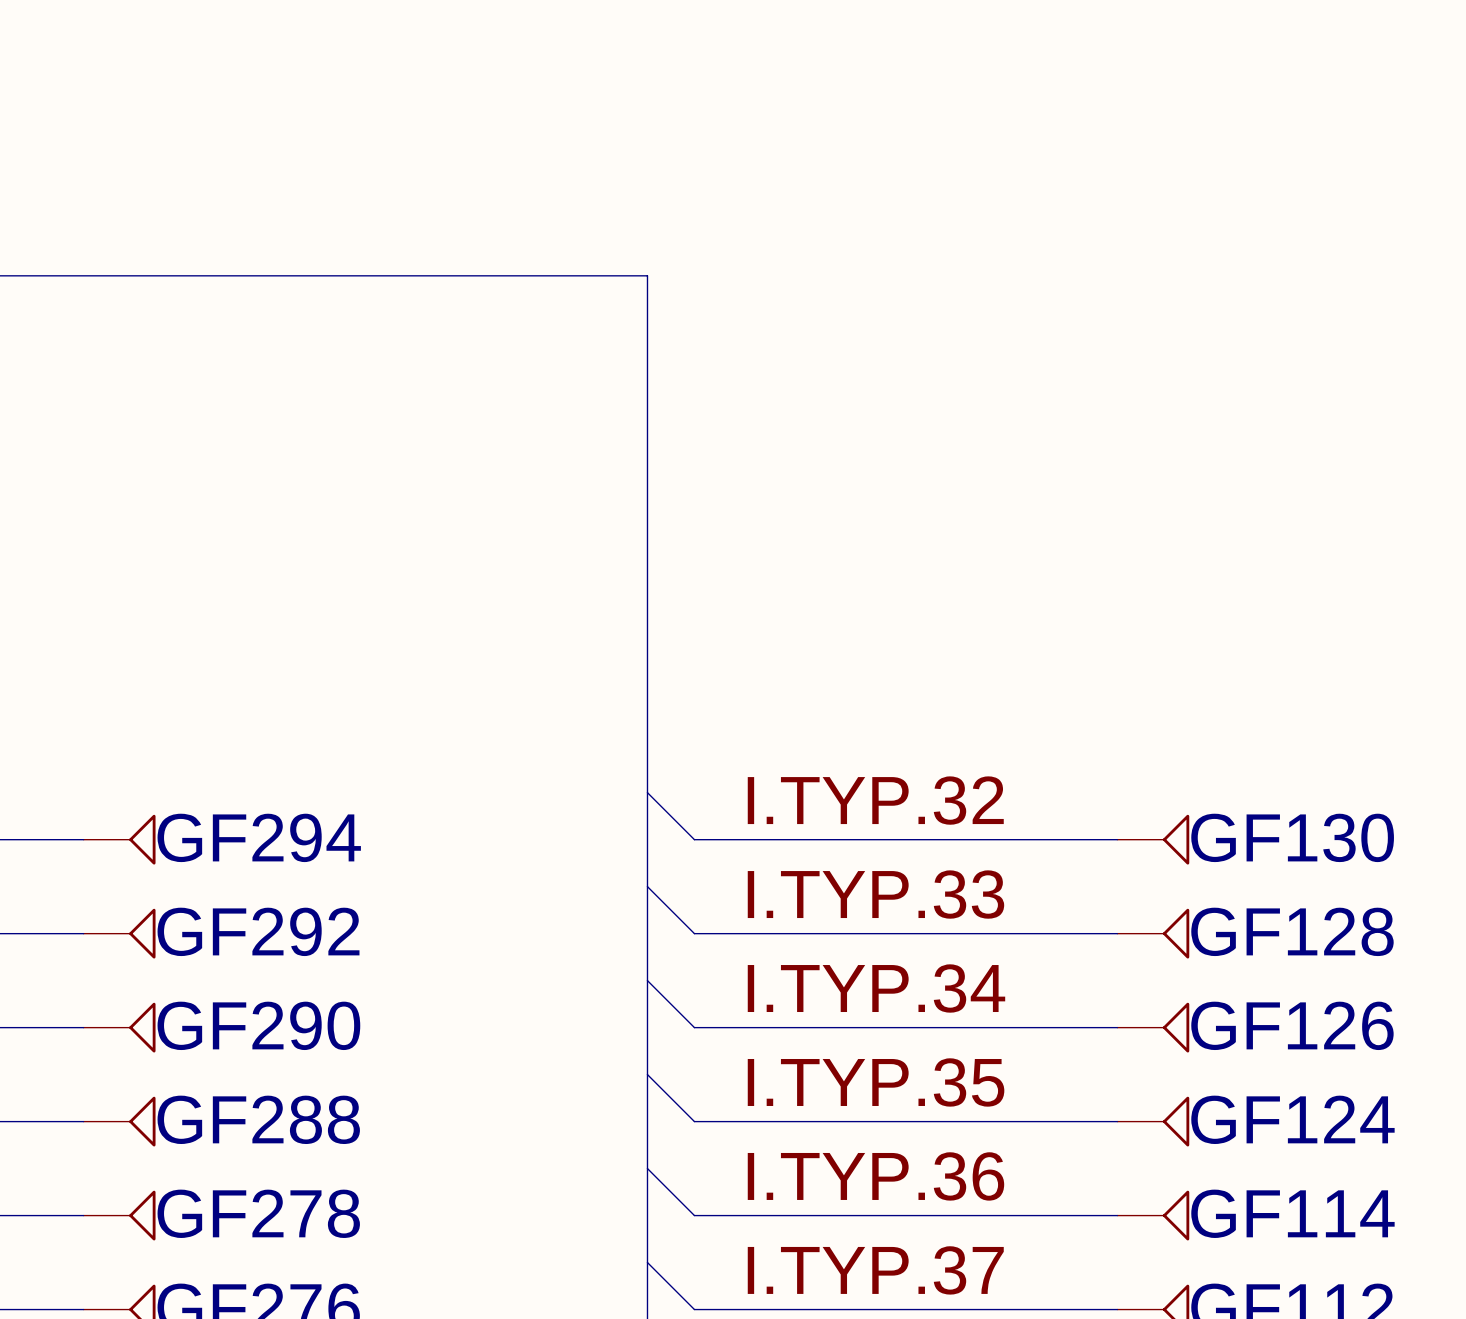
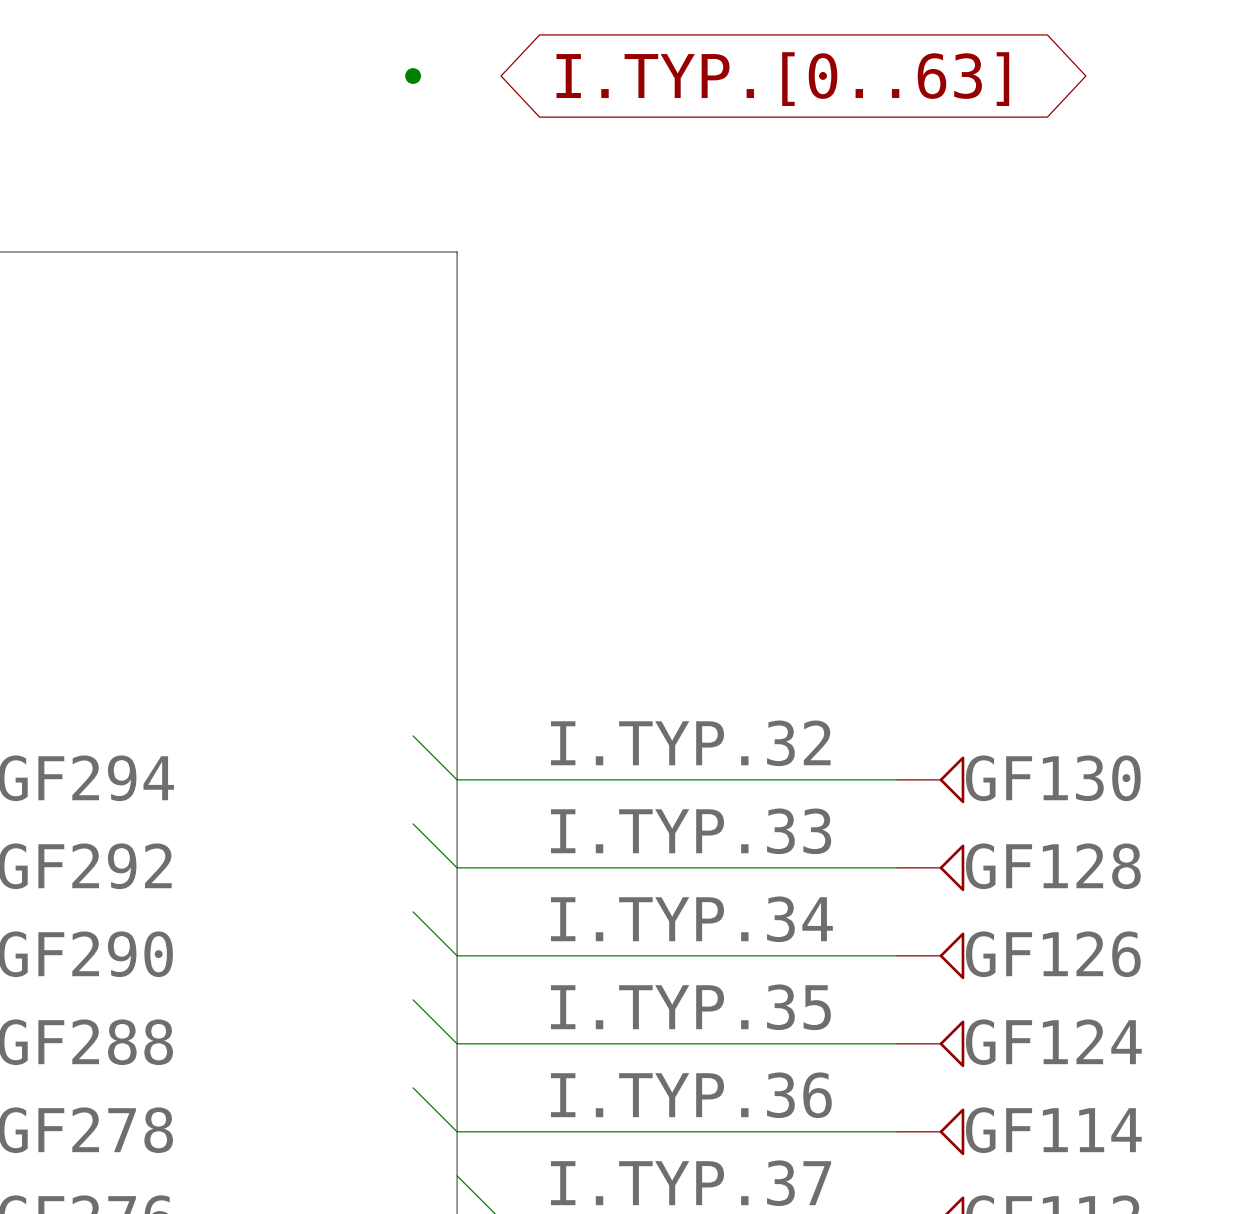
junction: none -> (413, 76)
global label: none -> I.TYP.[0..63] (782, 79)
wire: (647, 792) (694, 839) -> (413, 735) (457, 779) (501, 779)
wire: (647, 886) (694, 933) -> (413, 823) (457, 867) (501, 867)
wire: (647, 980) (694, 1027) -> (413, 911) (457, 955) (501, 955)
wire: (647, 1074) (694, 1121) -> (413, 999) (457, 1043) (501, 1043)
wire: (647, 1168) (694, 1215) -> (413, 1087) (457, 1131) (501, 1131)

